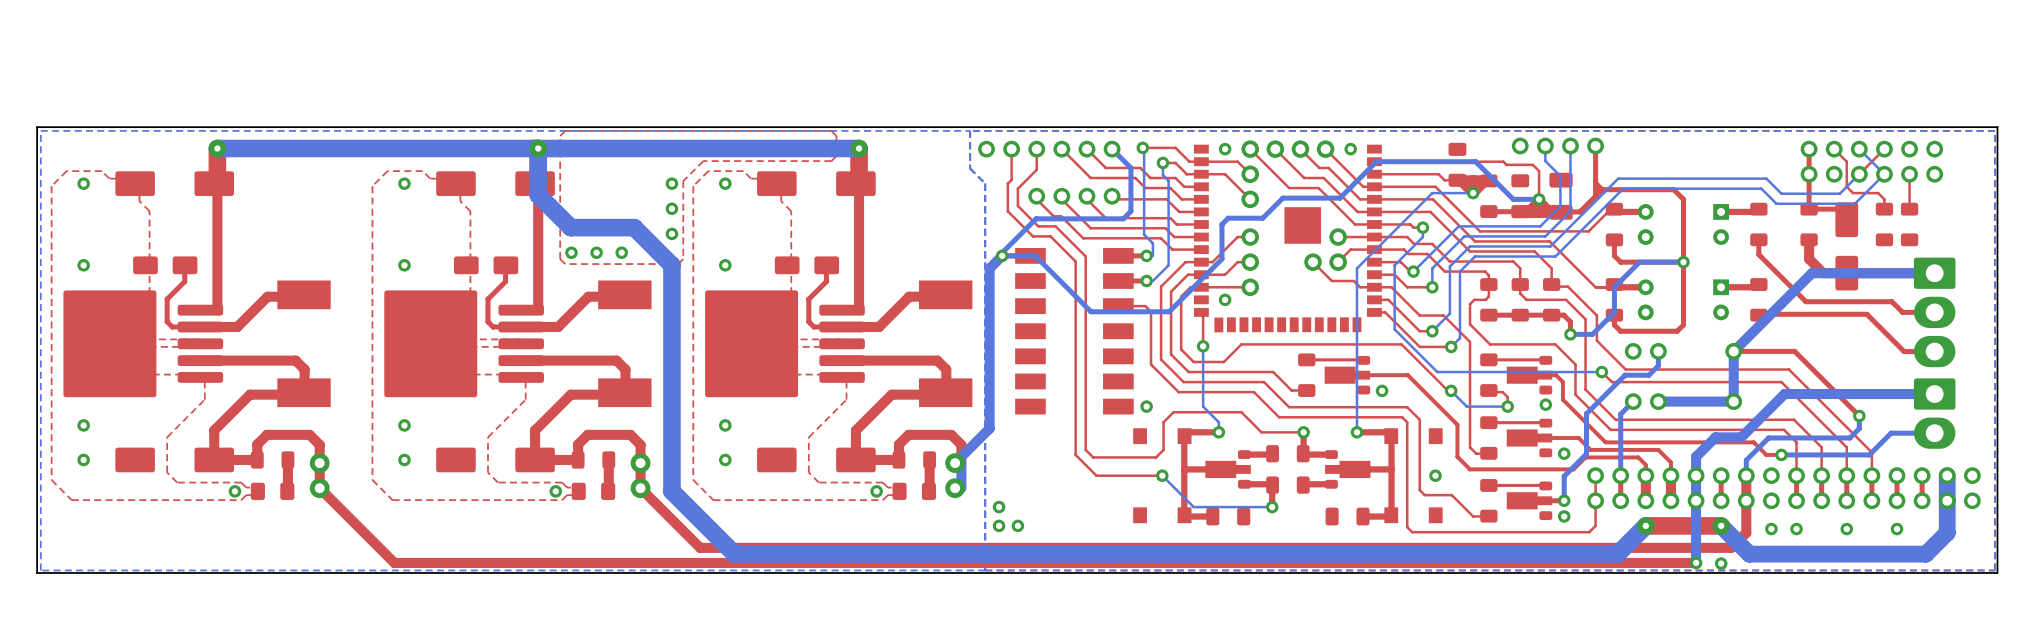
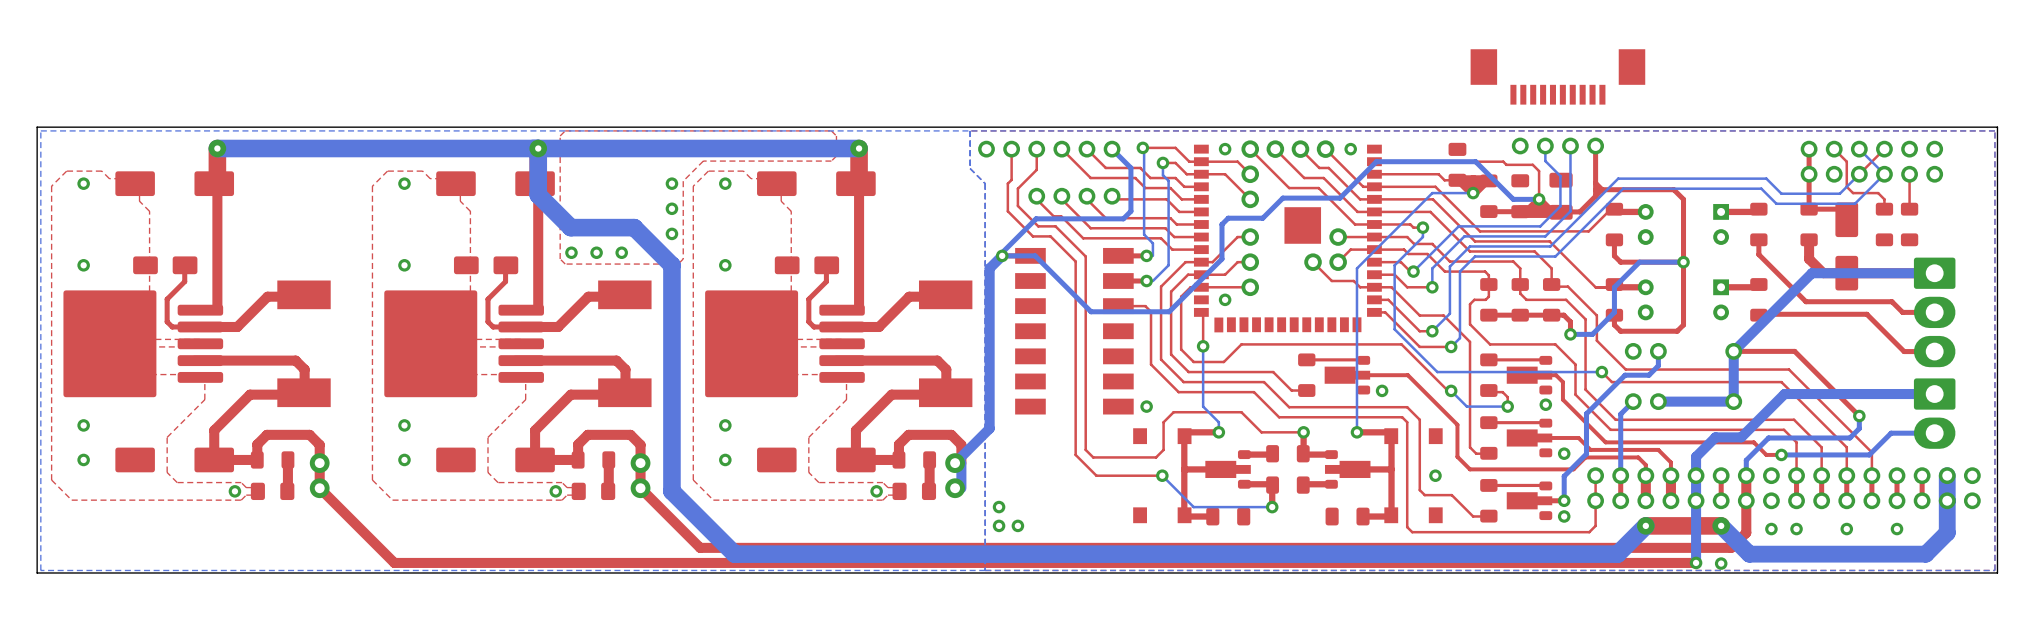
part: none -> (1557, 76)

